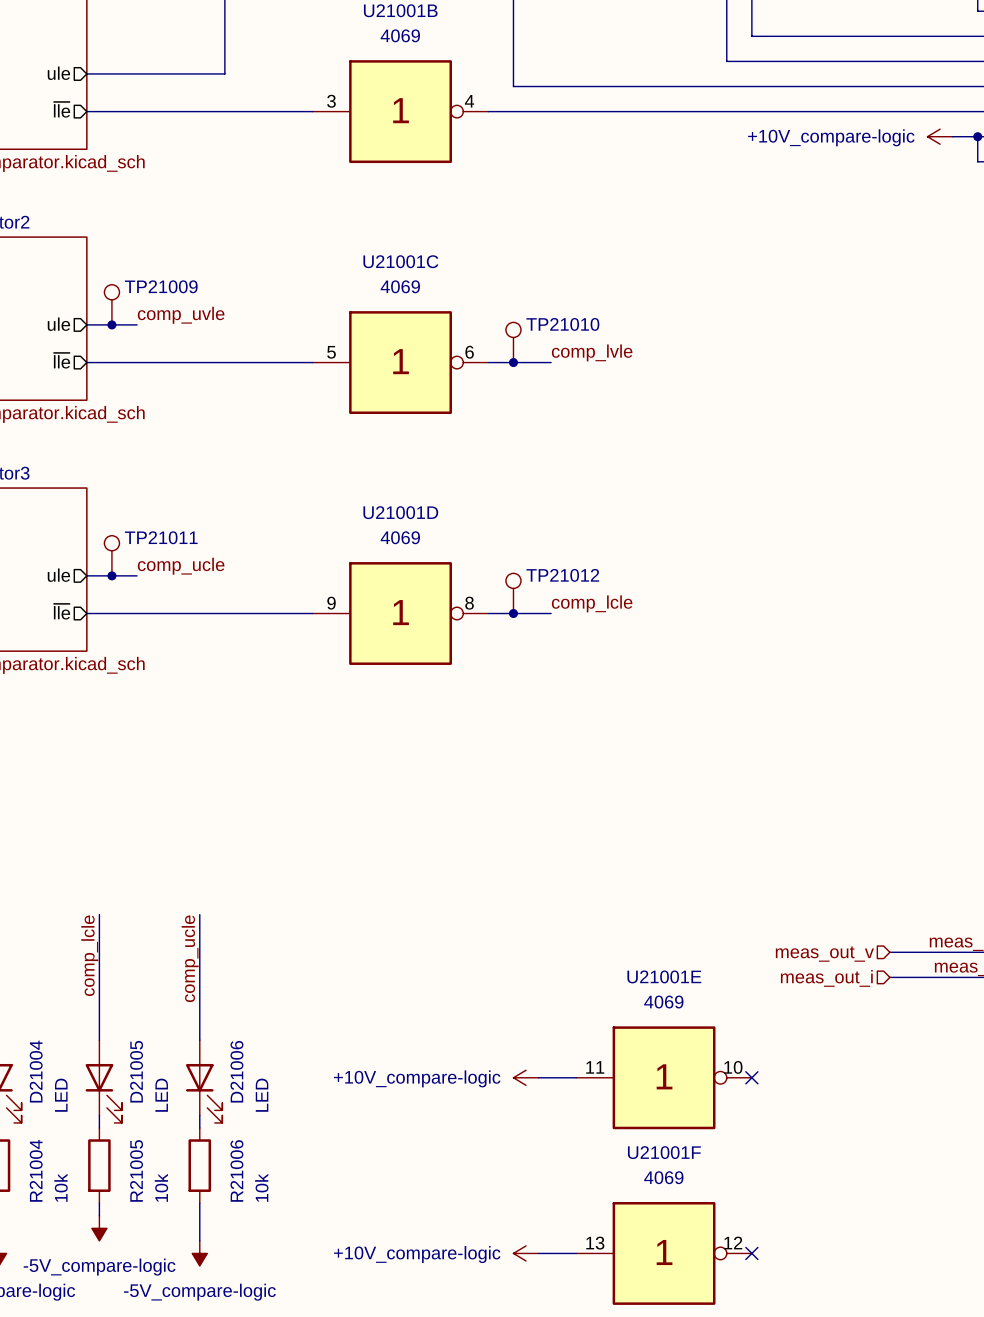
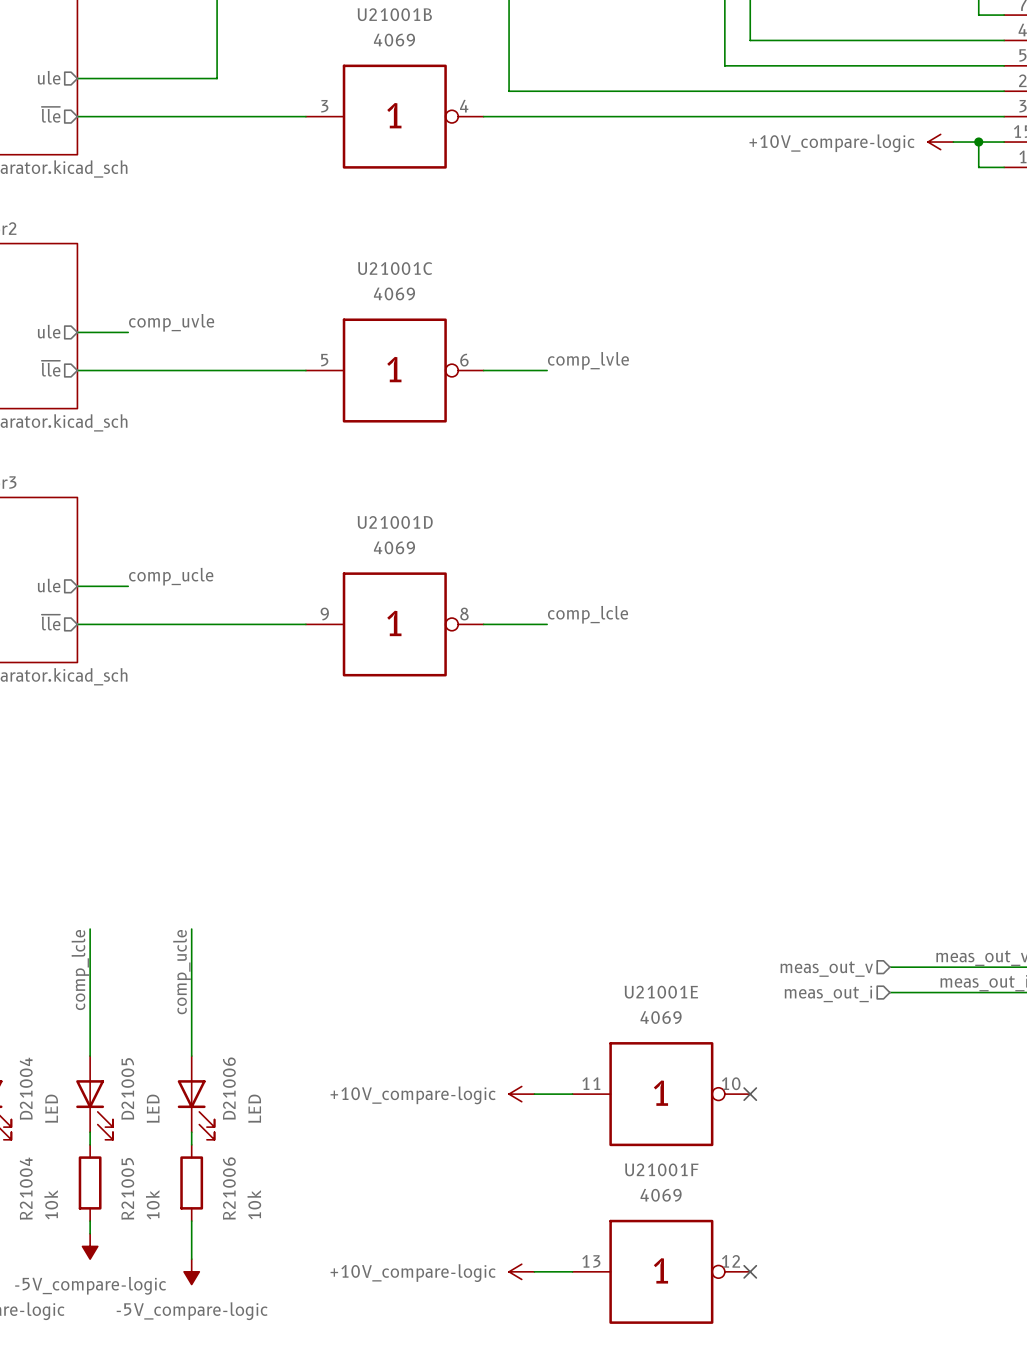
TP21009: (111, 304) -> none
junction: (111, 324) -> none
TP21010: (513, 342) -> none
junction: (513, 362) -> none
TP21011: (111, 555) -> none
junction: (111, 575) -> none
TP21012: (513, 593) -> none
junction: (513, 613) -> none

